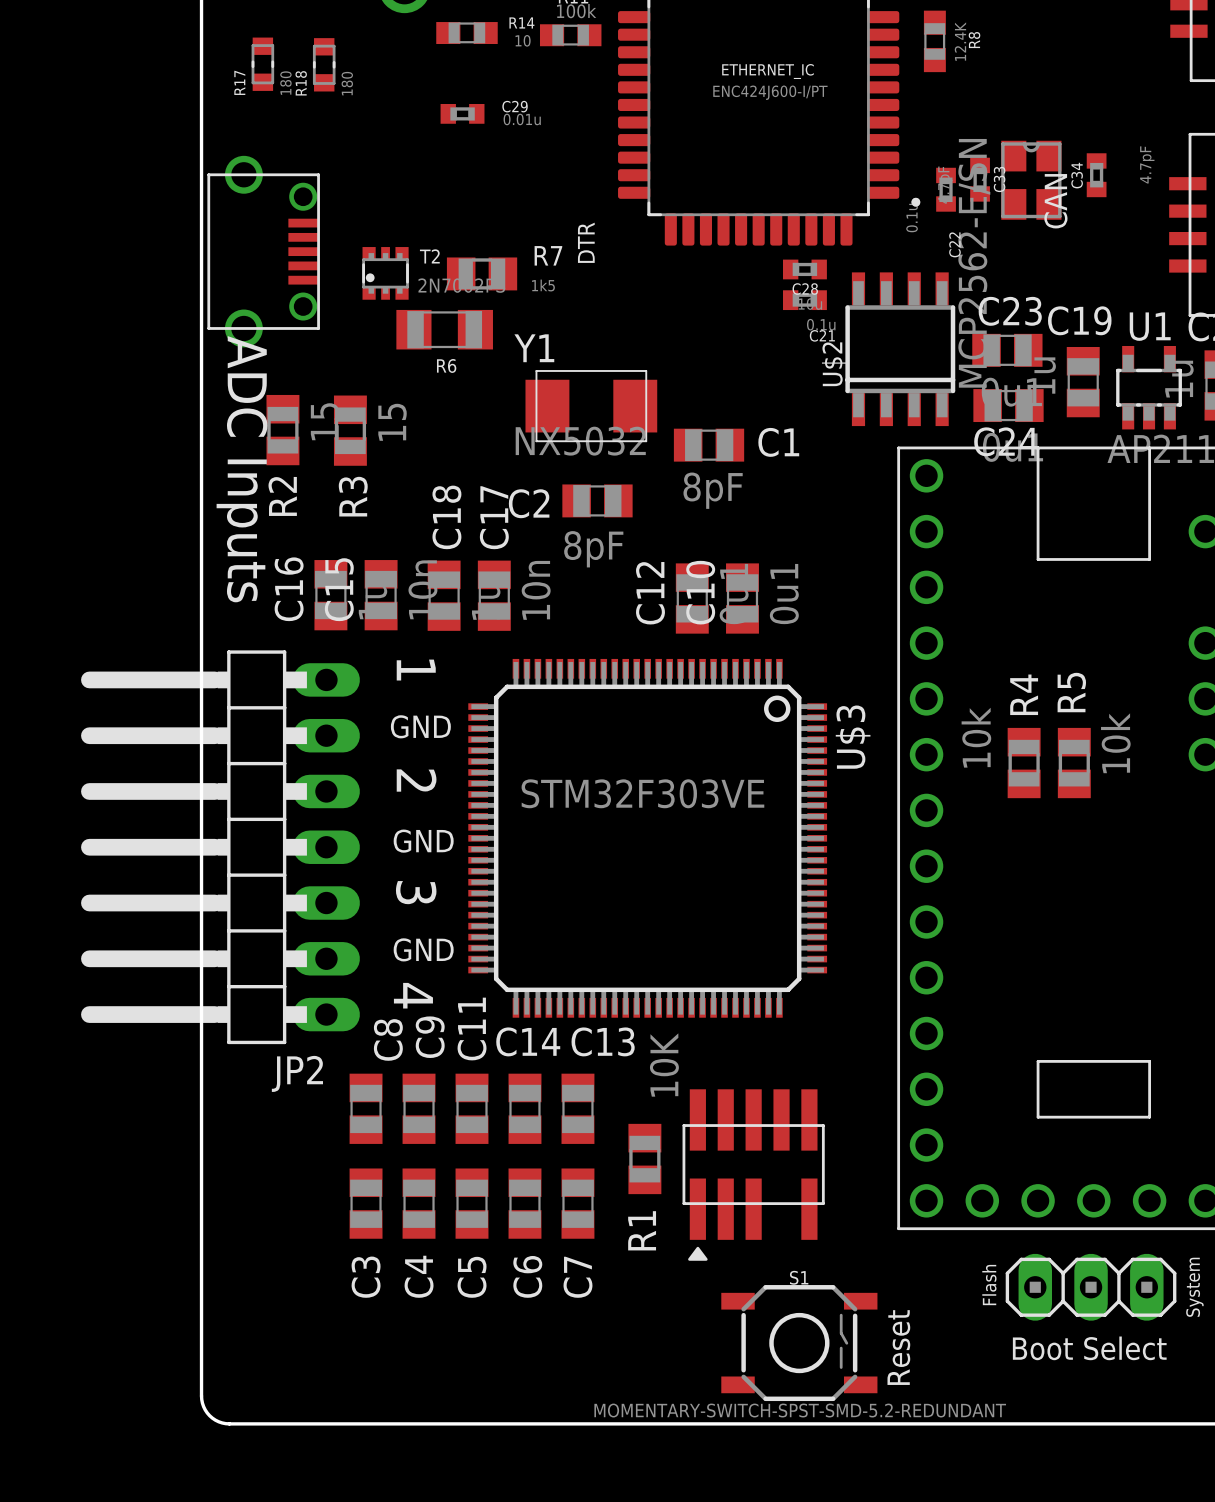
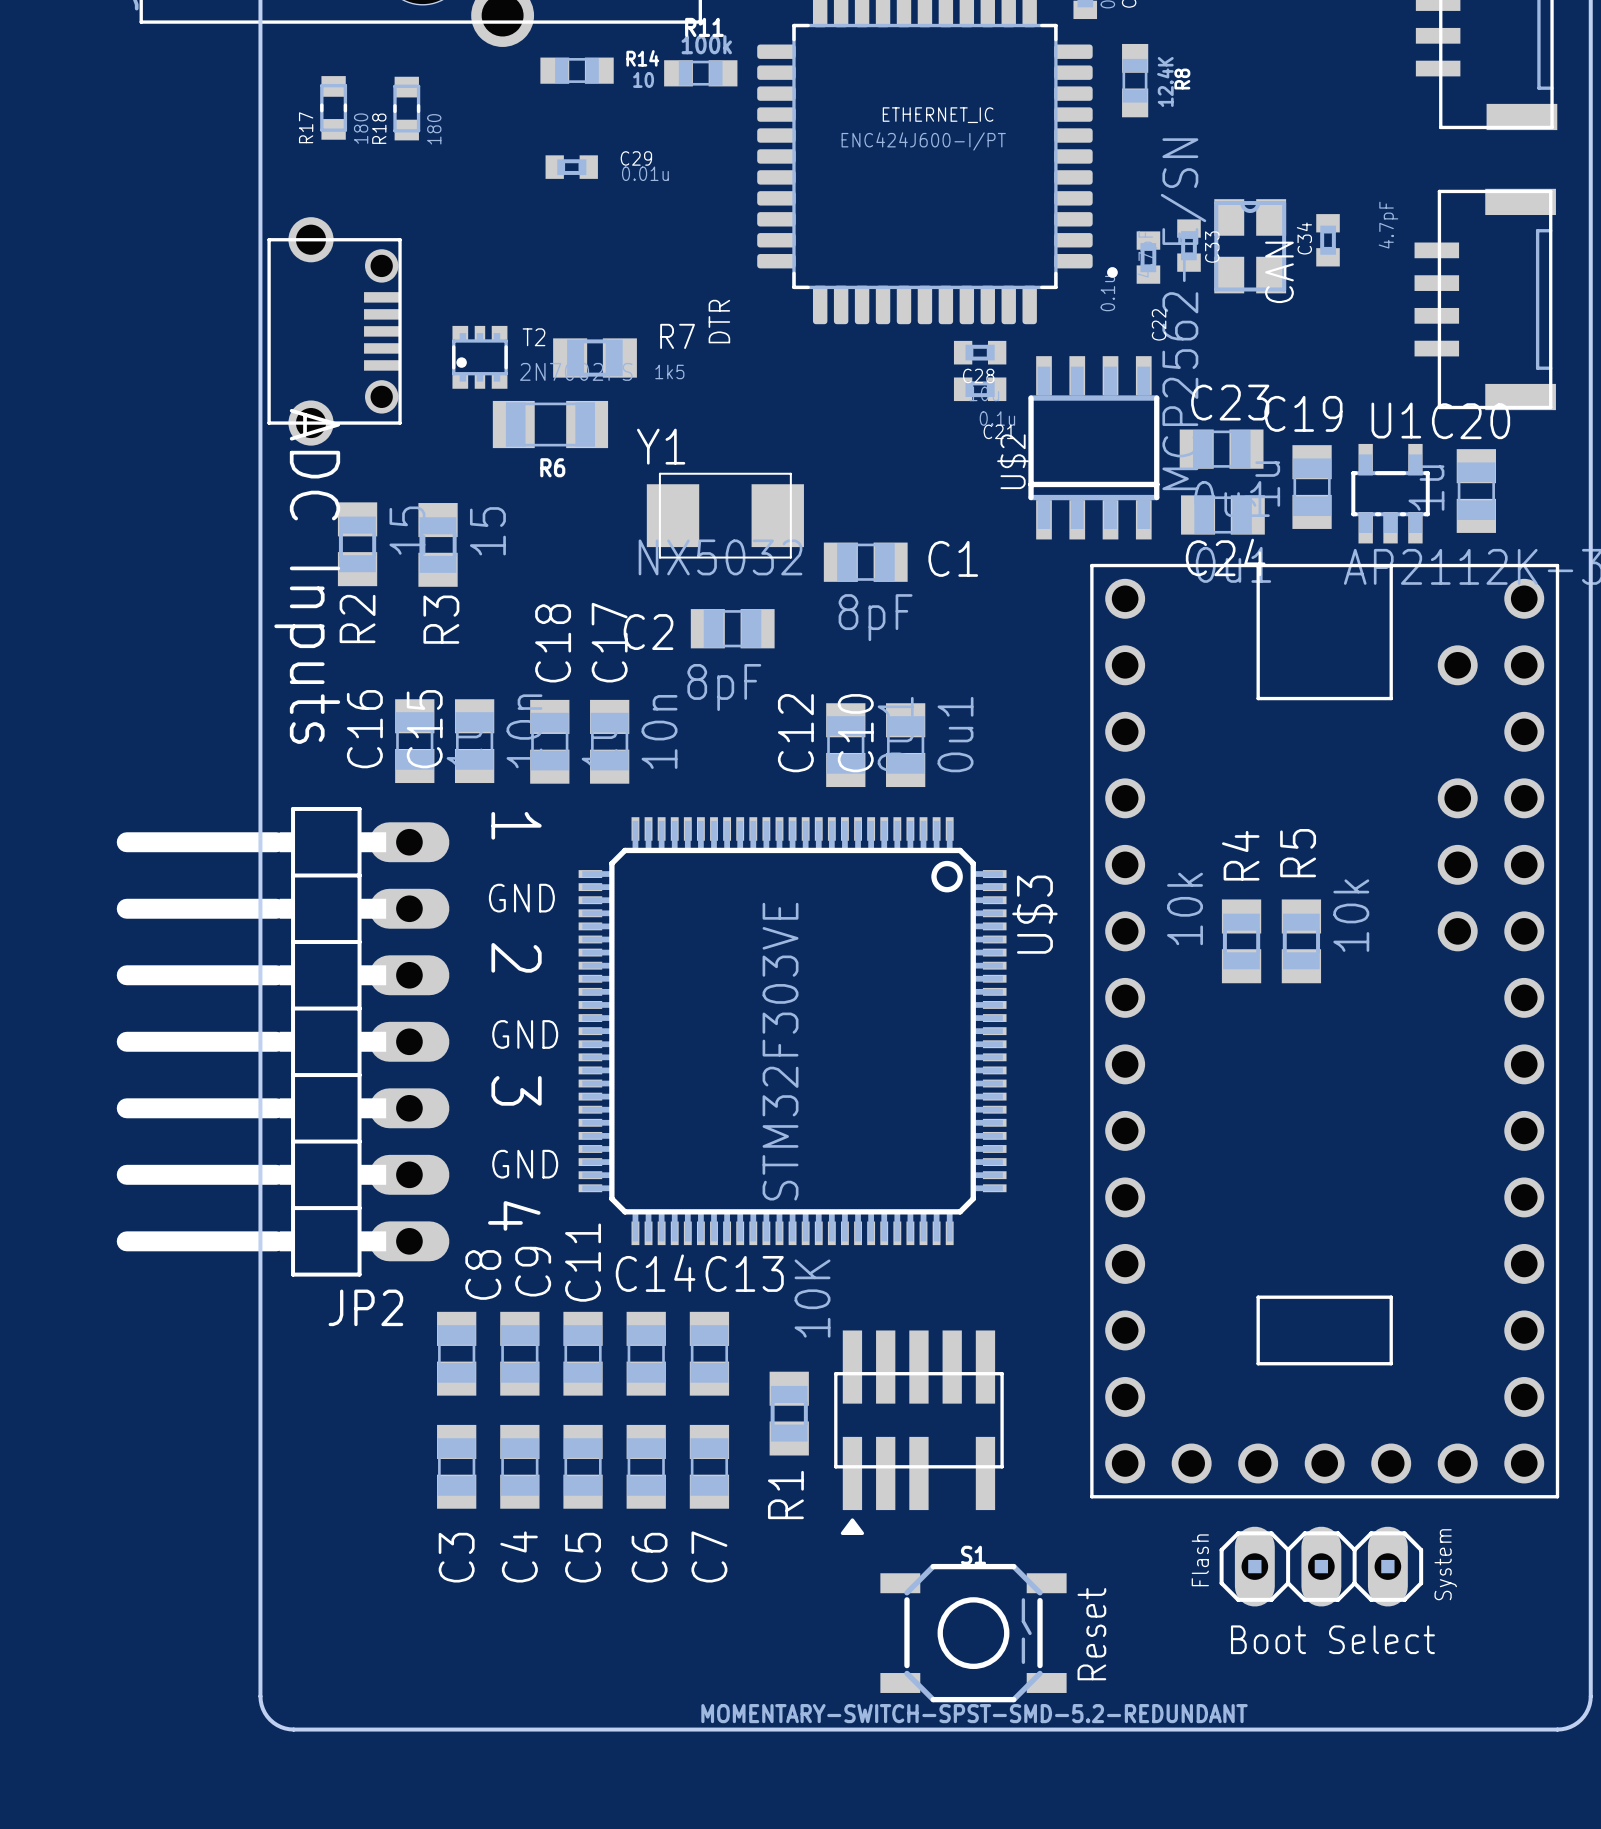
U$3 value rotation: 0° (642, 793) -> 90° counterclockwise (780, 1051)

